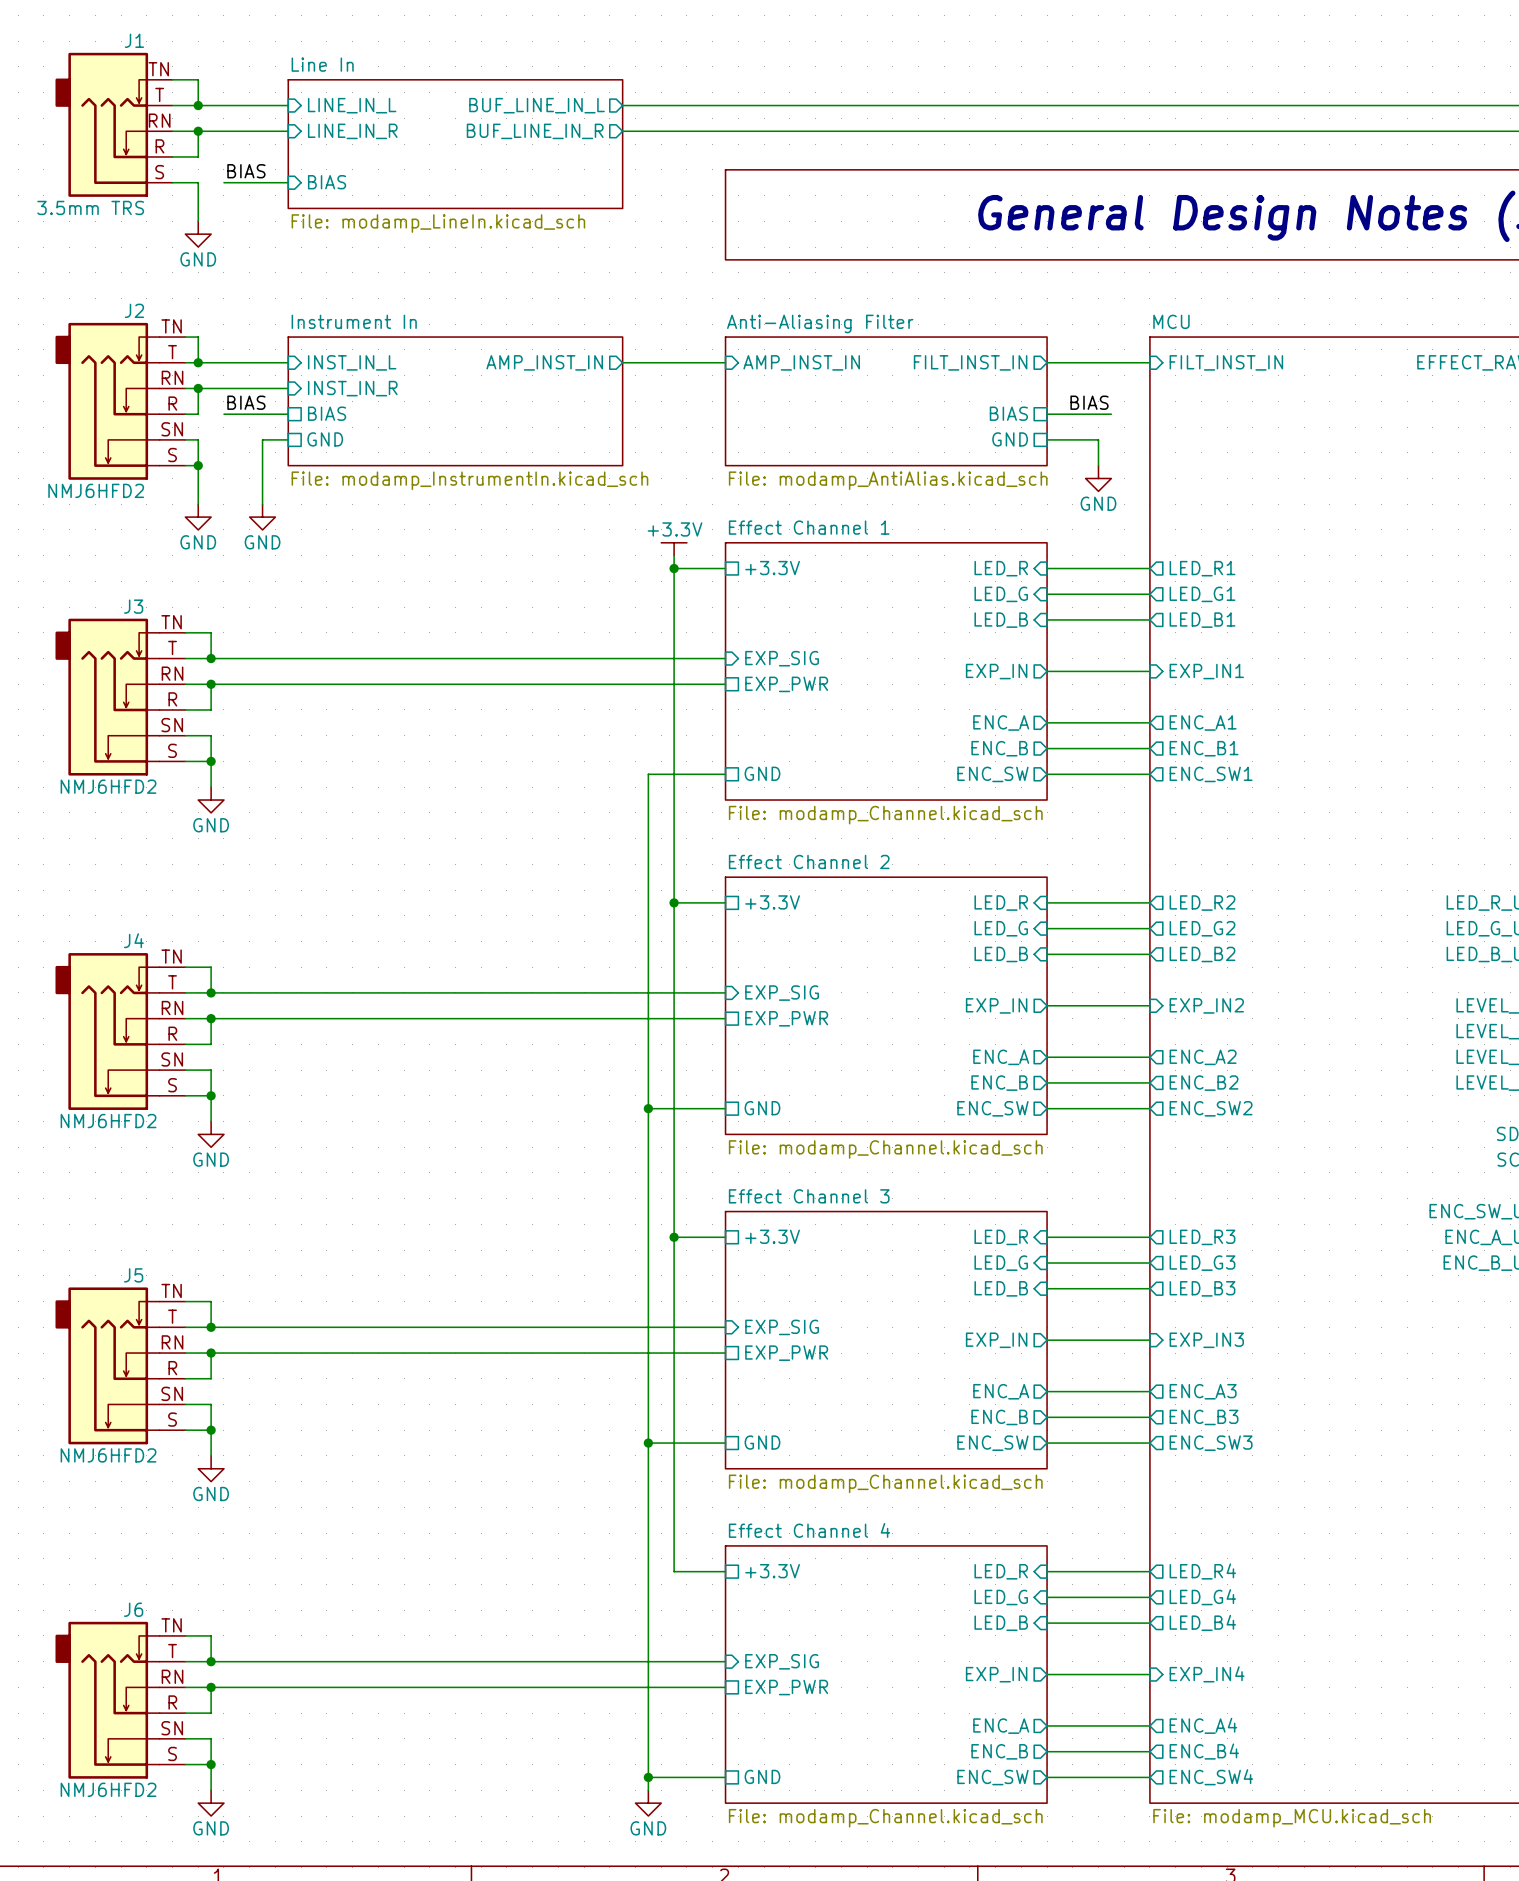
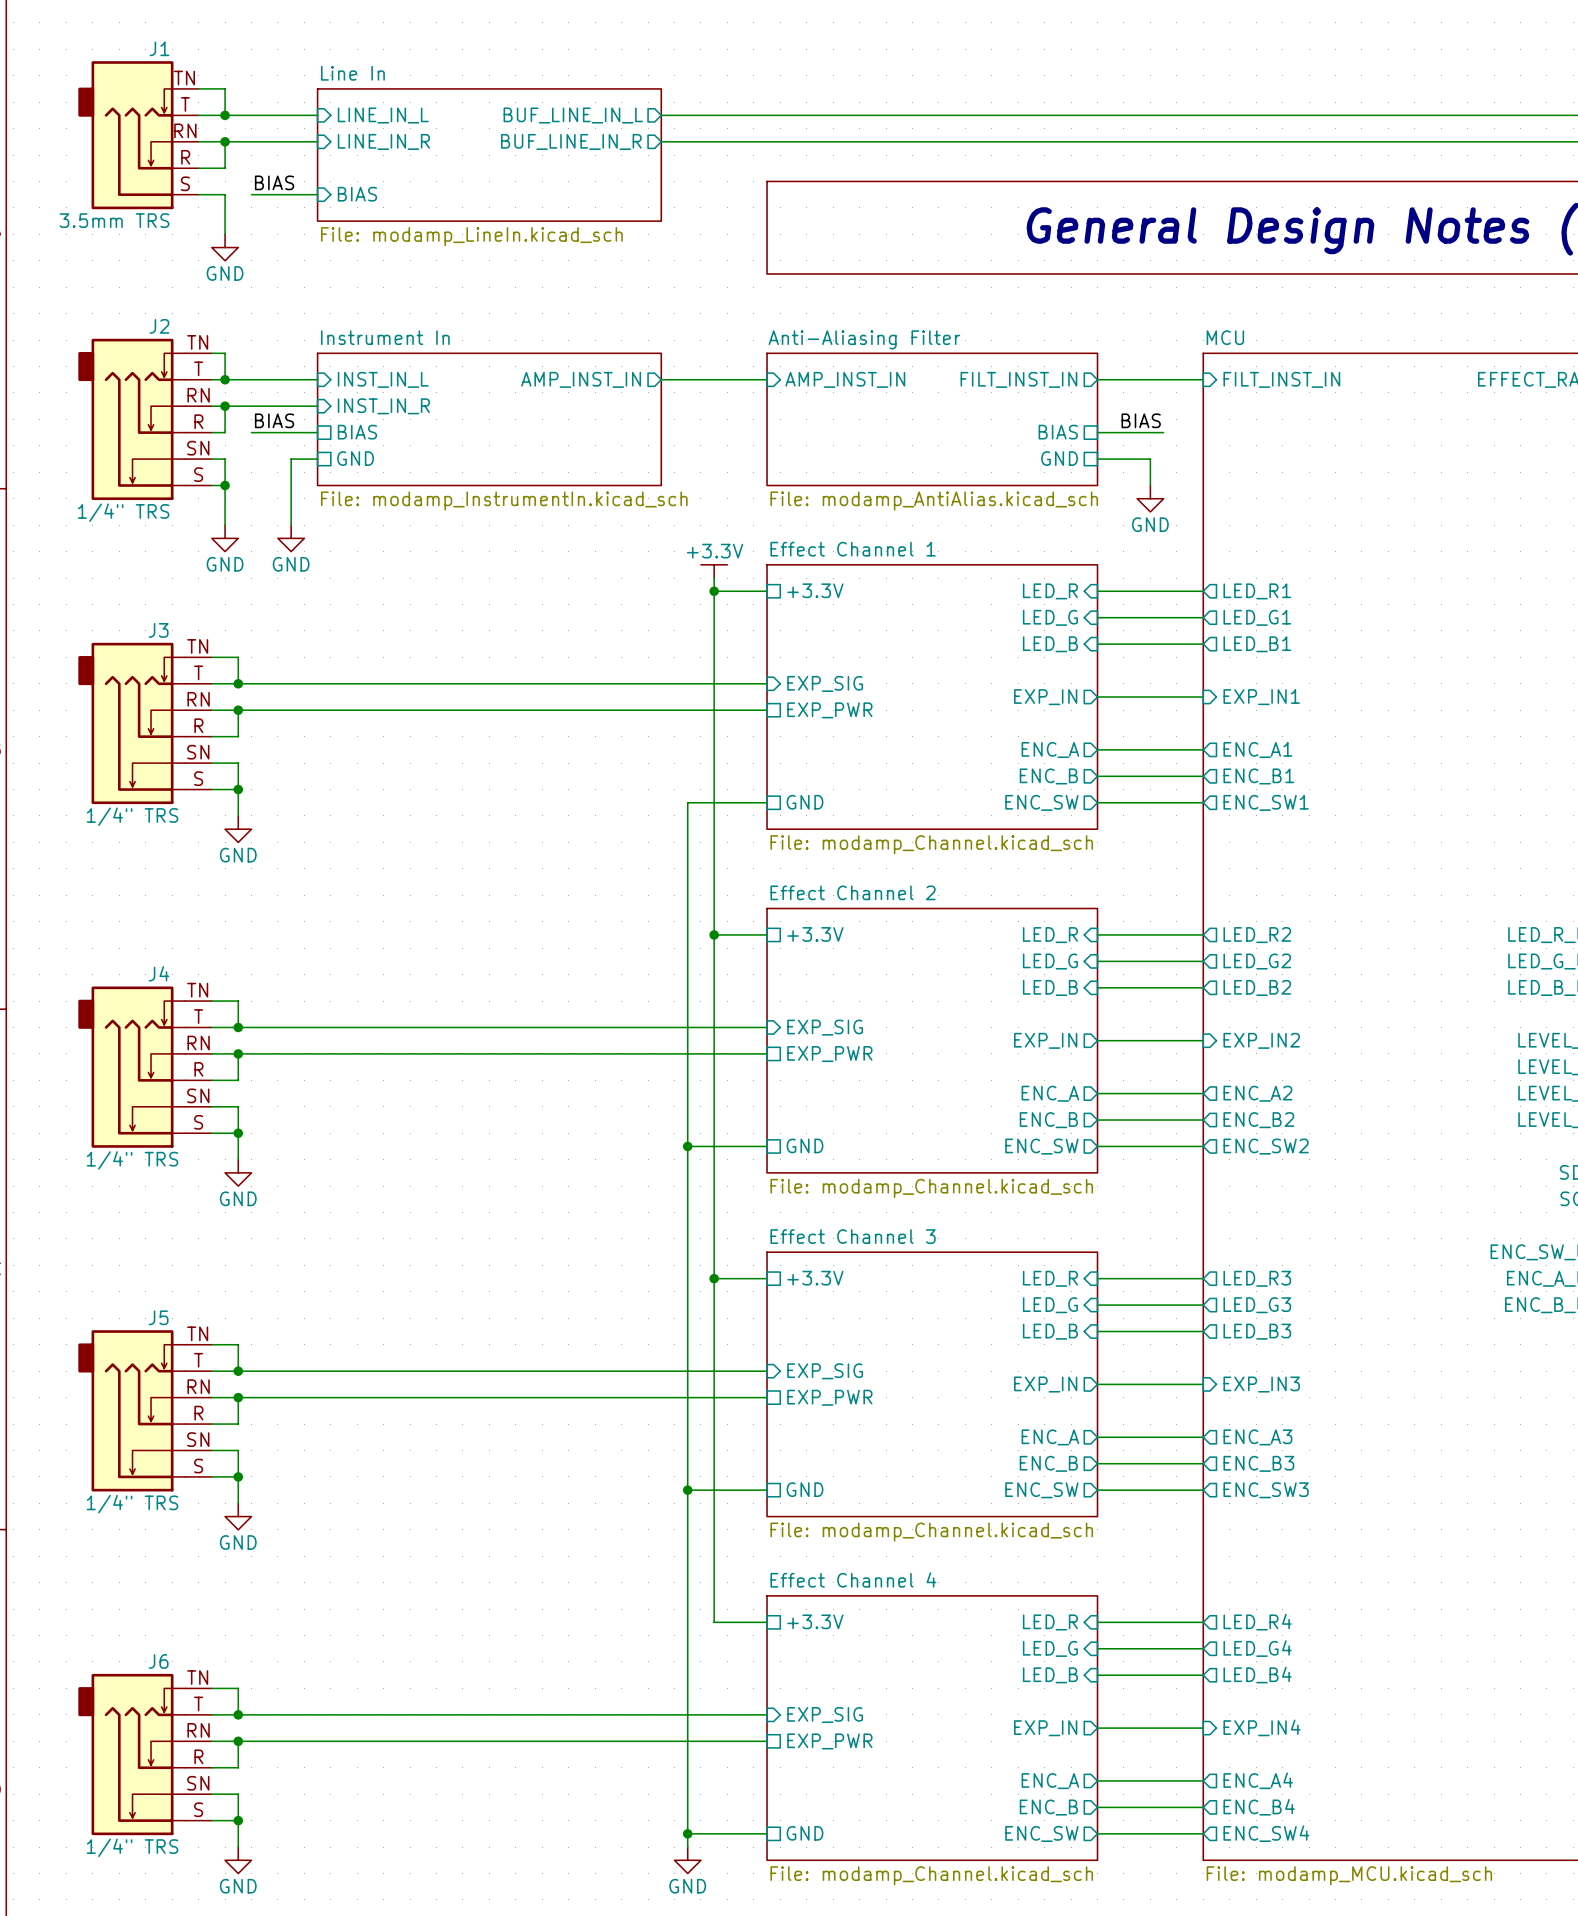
J2 value: NMJ6HFD2 (96, 490) -> 1/4" TRS (123, 512)
J3 value: NMJ6HFD2 (108, 786) -> 1/4" TRS (132, 816)
J4 value: NMJ6HFD2 (108, 1121) -> 1/4" TRS (132, 1160)
J5 value: NMJ6HFD2 (108, 1455) -> 1/4" TRS (132, 1504)
J6 value: NMJ6HFD2 (108, 1789) -> 1/4" TRS (132, 1847)

